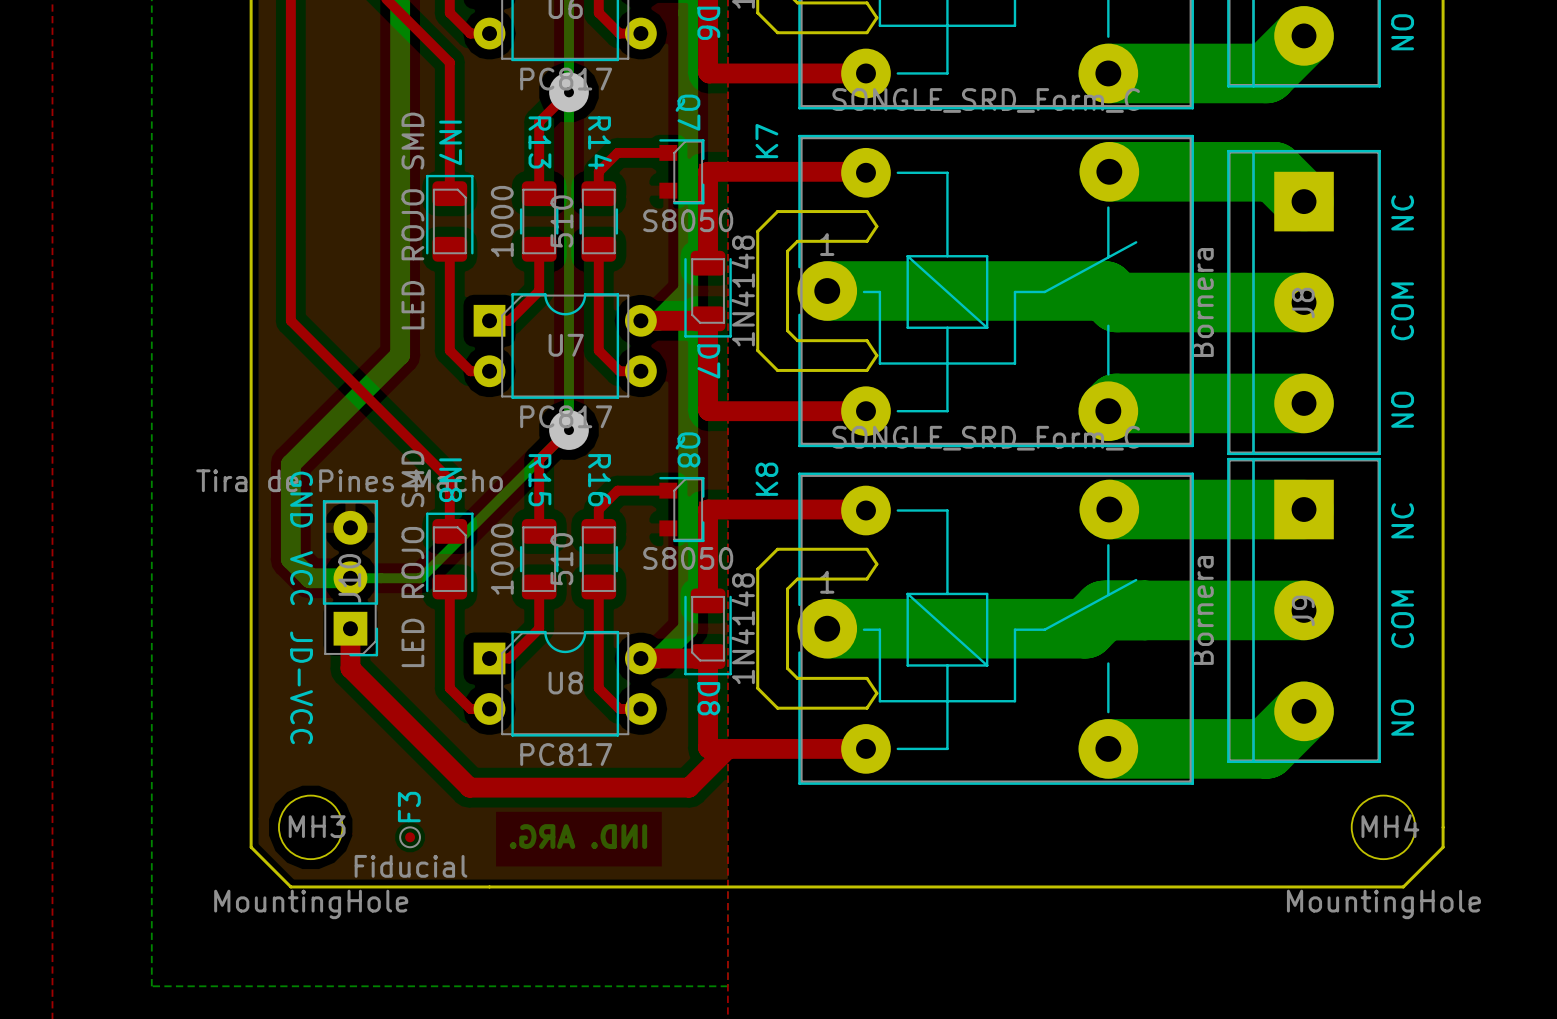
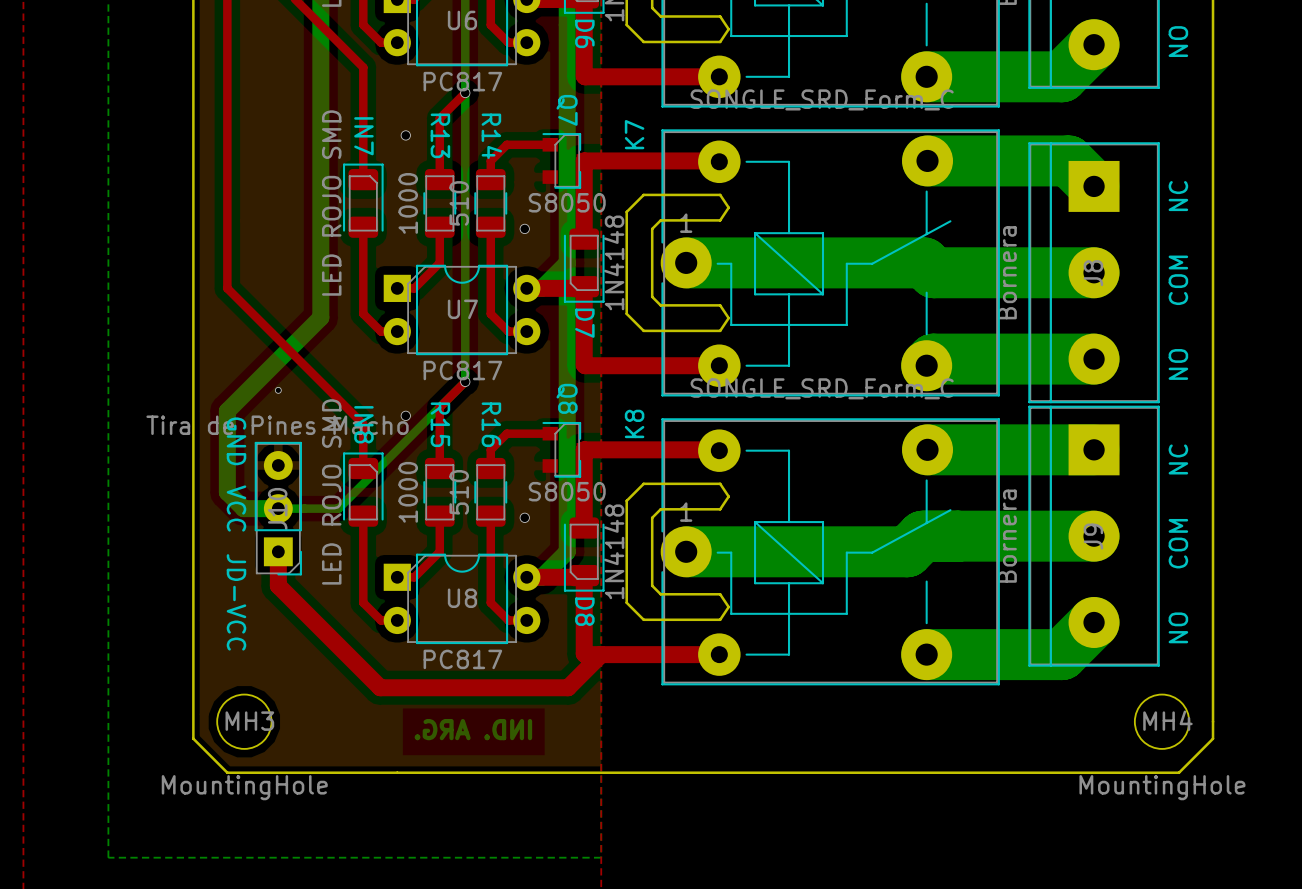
via size: [549, 72, 589, 113] -> [460, 87, 471, 99]
via: none -> (405, 135)
via: none -> (524, 228)
via size: [549, 410, 589, 450] -> [460, 376, 471, 387]
via: none -> (278, 390)
via: none -> (405, 415)
via: none -> (524, 517)
F3: Fiducial (410, 837) -> none

